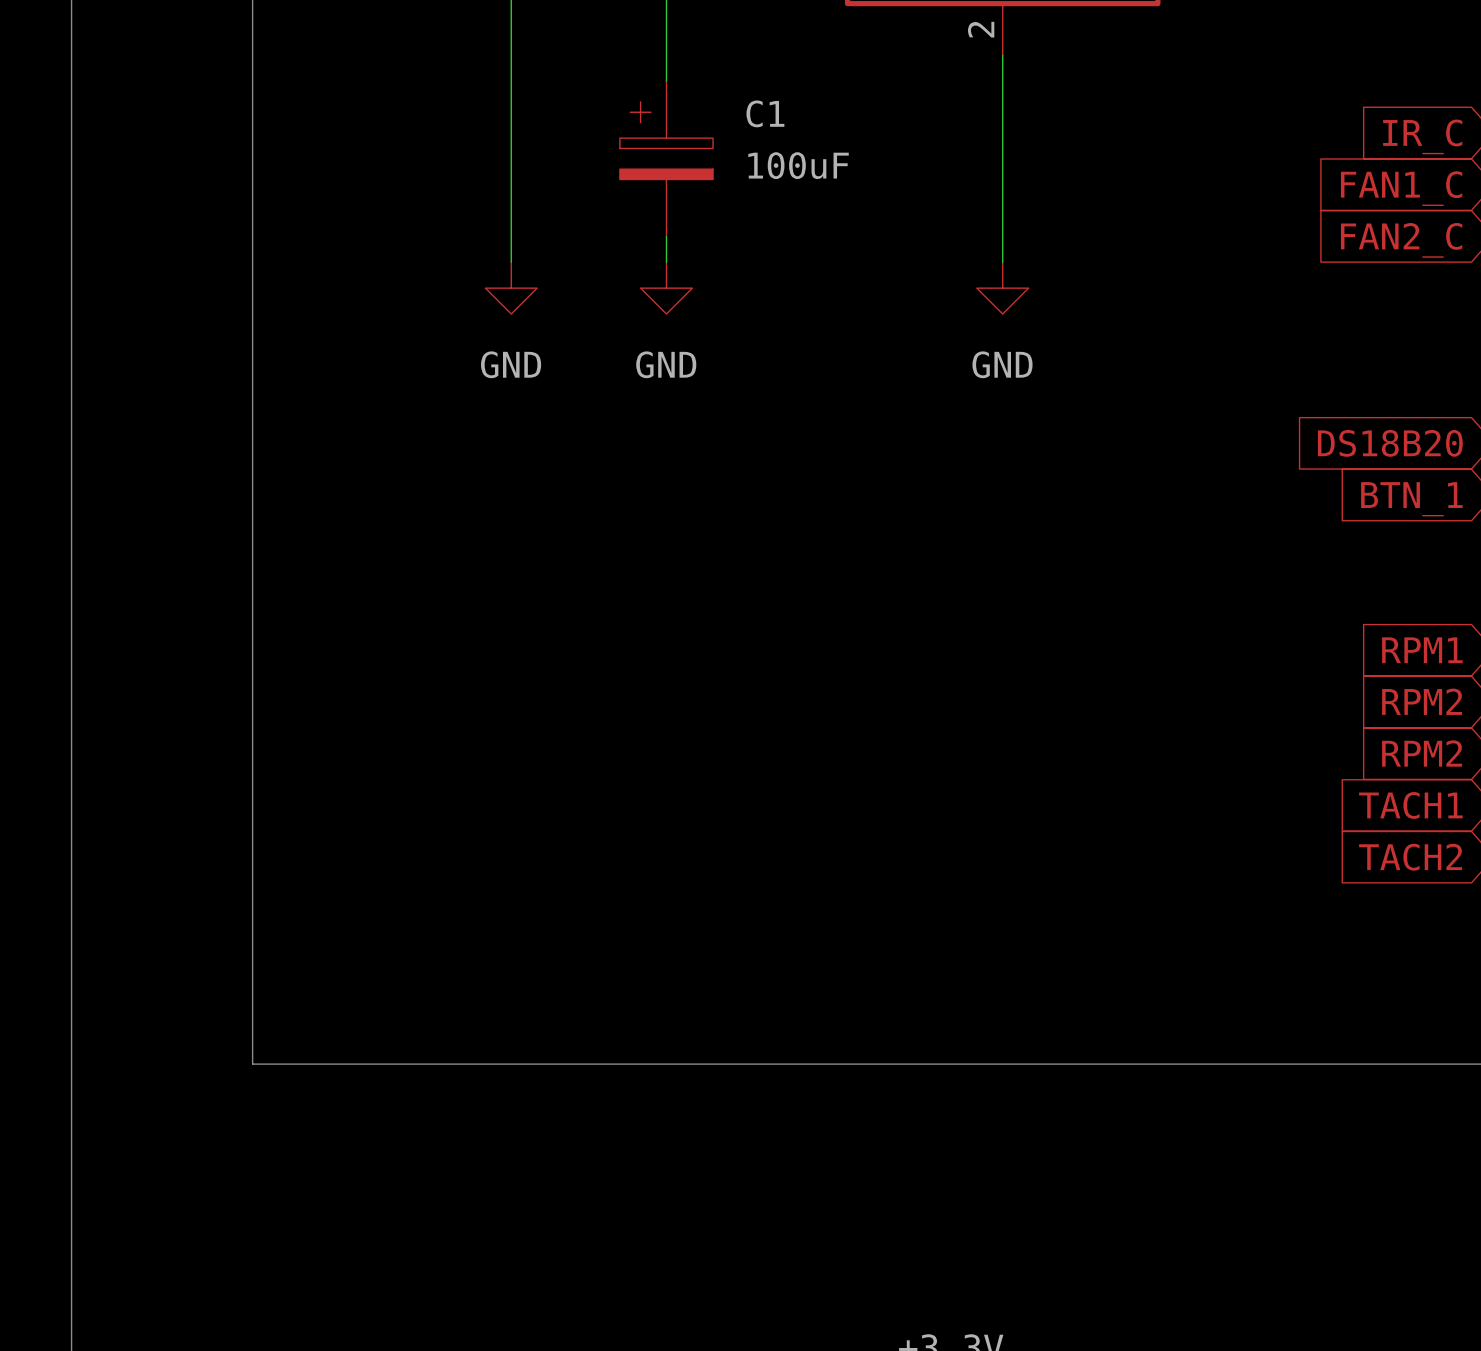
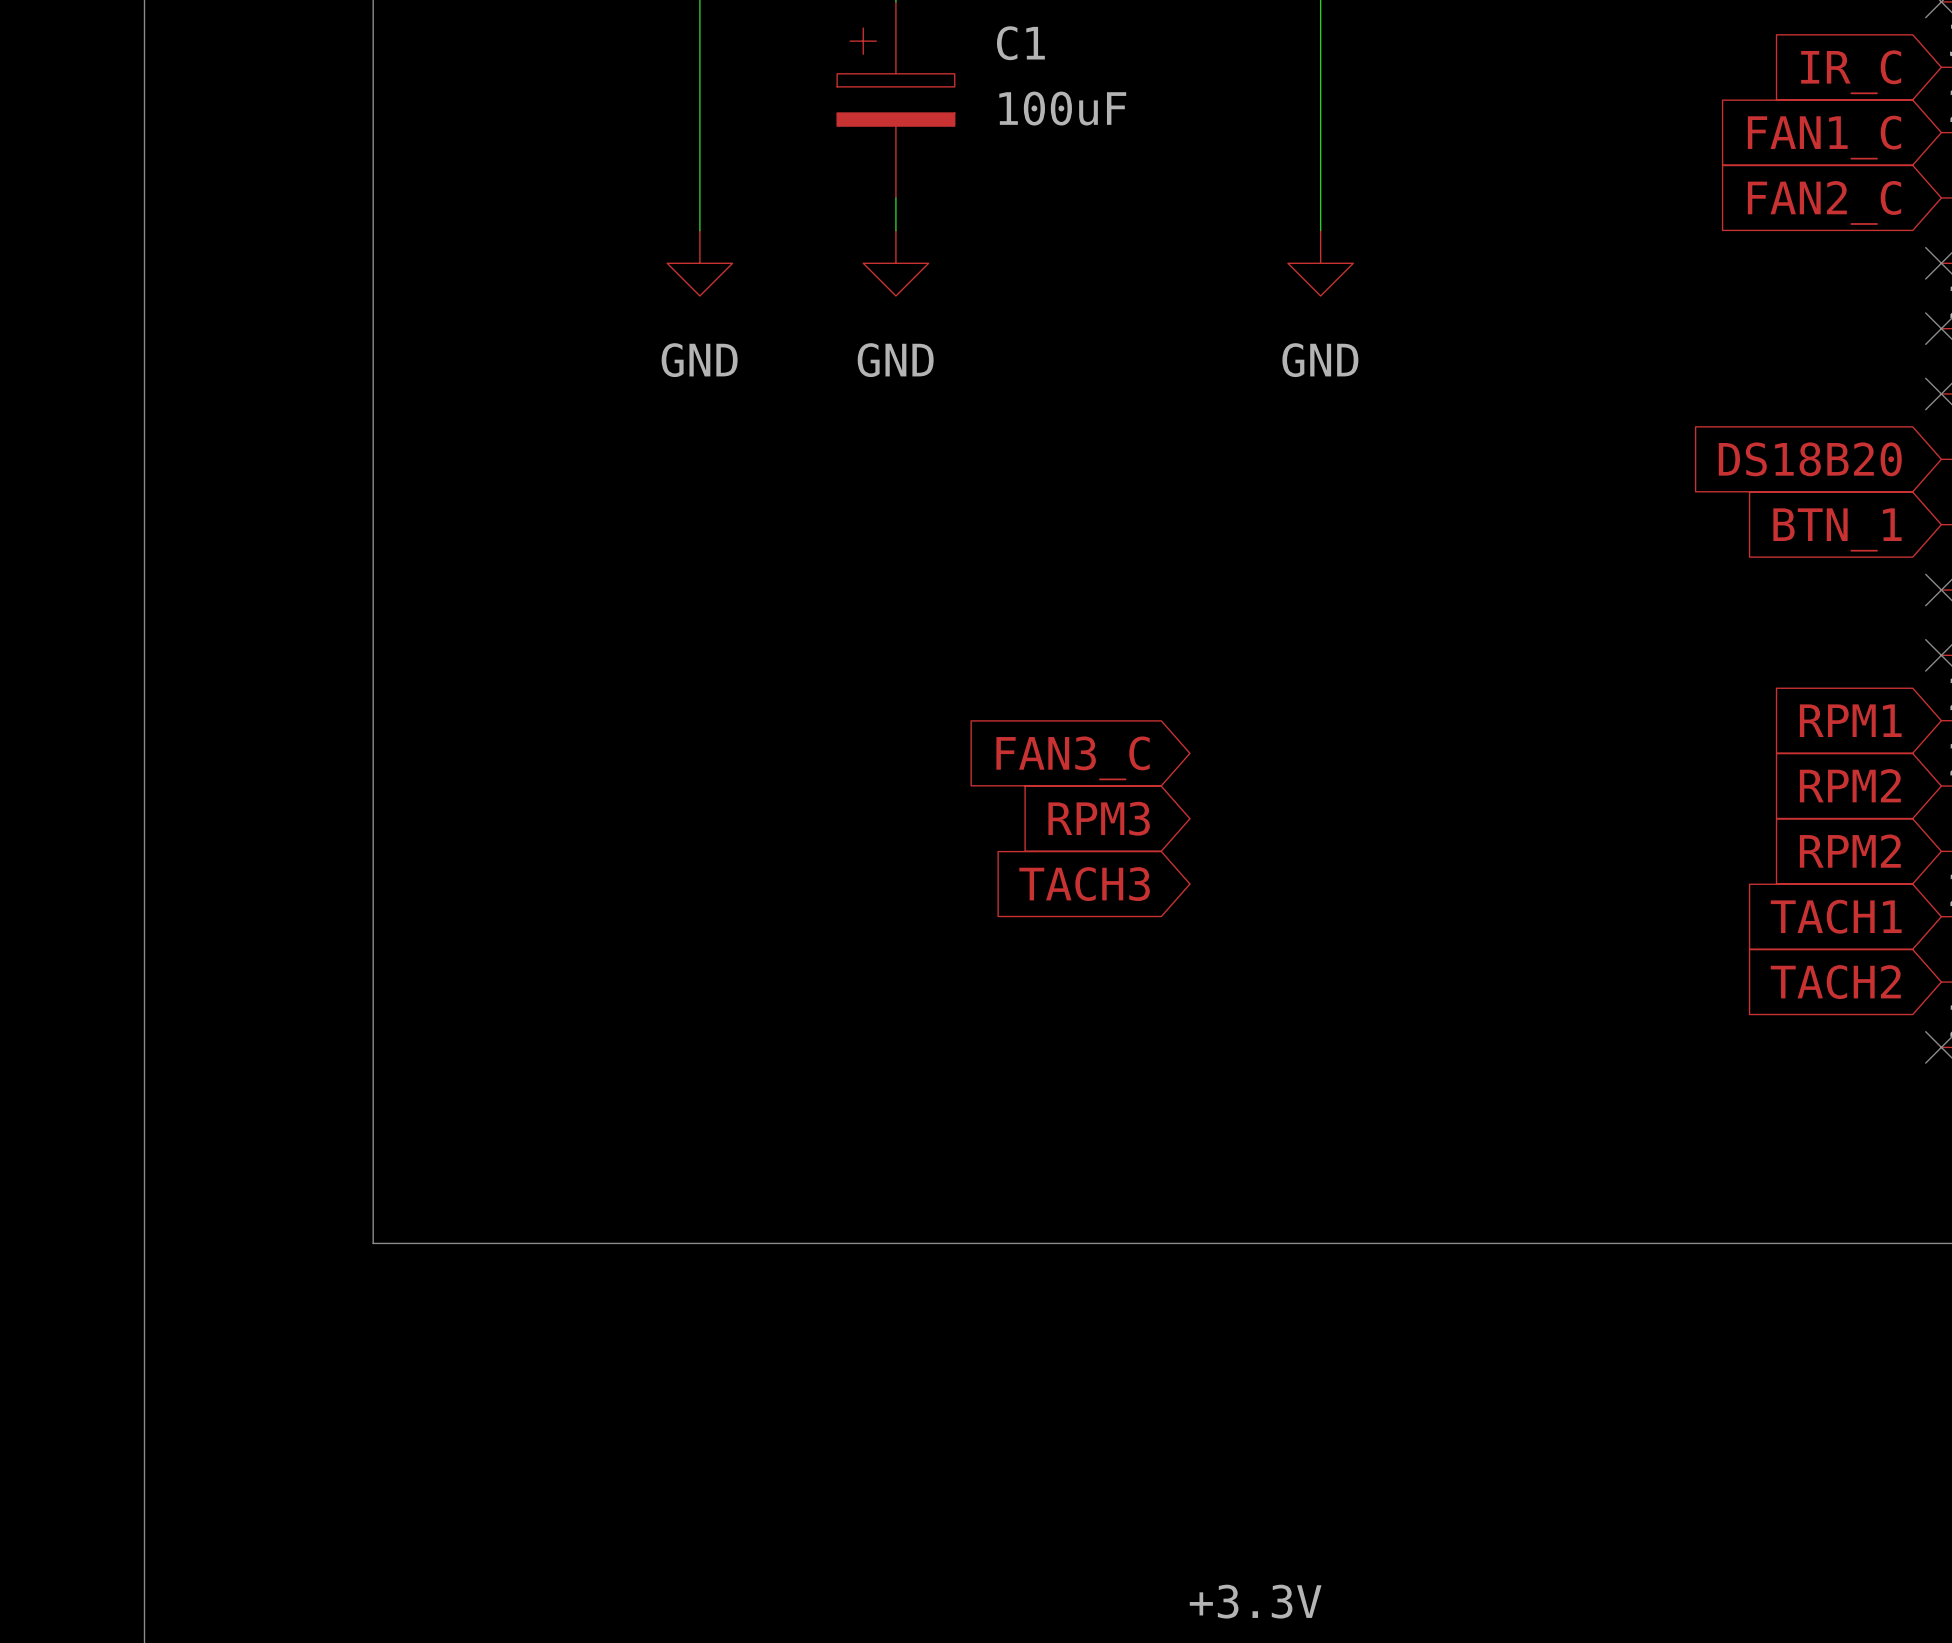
global label: none -> FAN3_C (1073, 758)
global label: none -> RPM3 (1099, 818)
global label: none -> TACH3 (1084, 884)

